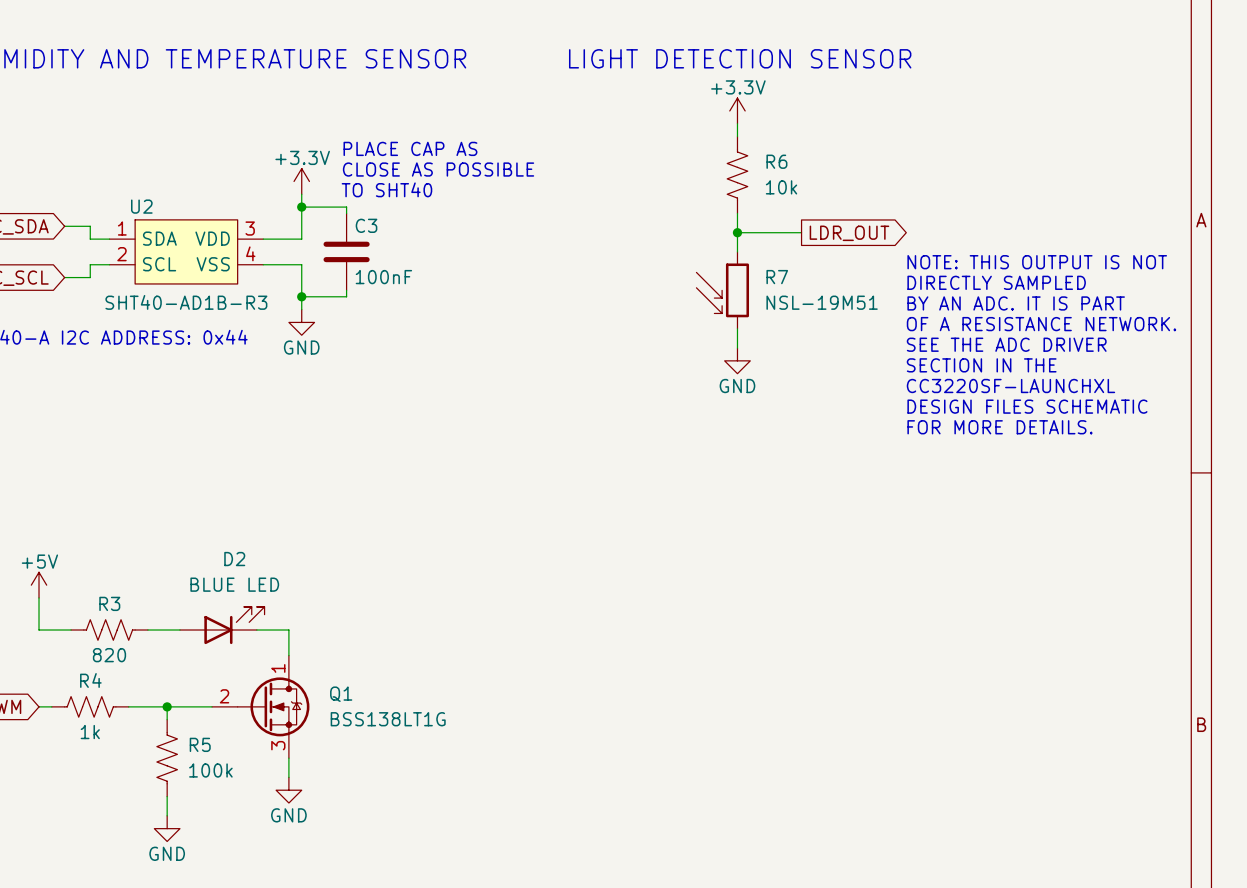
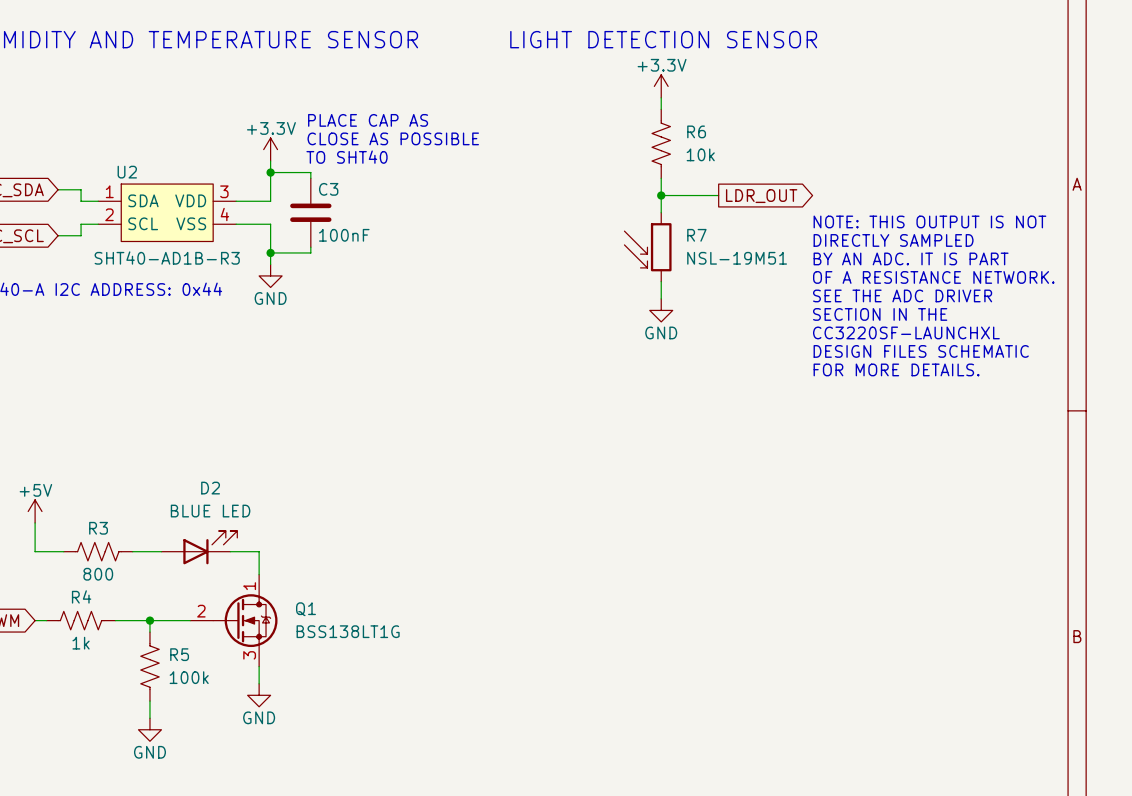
R3 value: 820 (109, 655) -> 800 (98, 574)

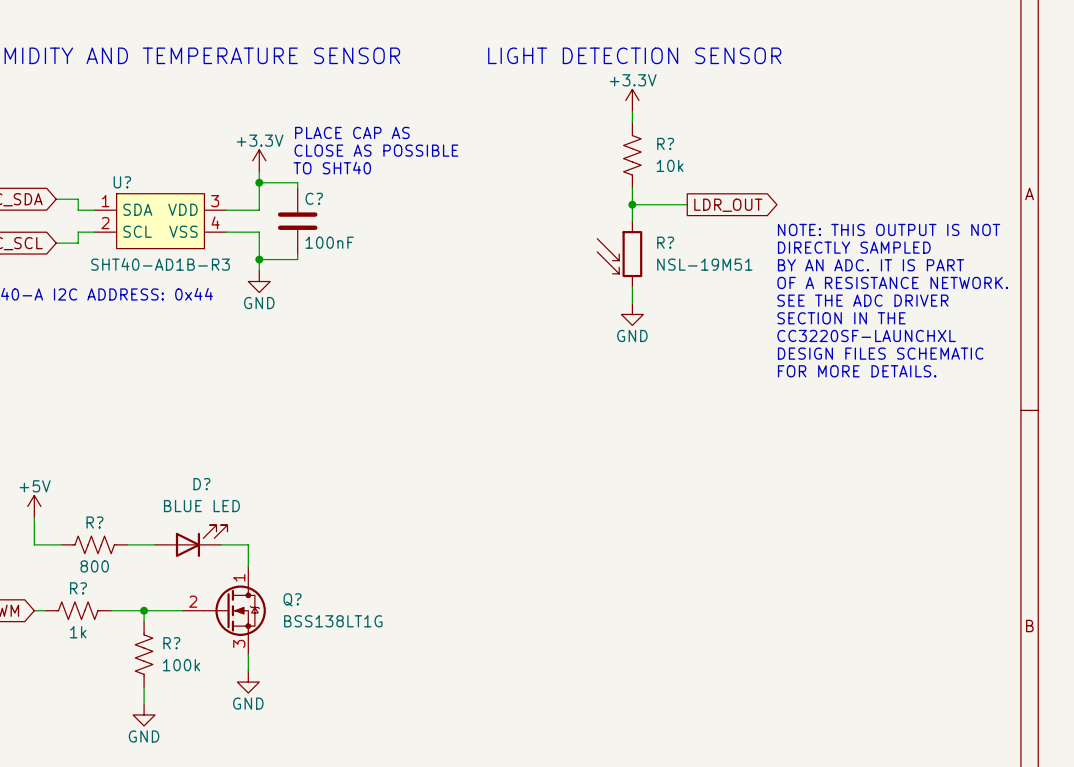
R6 name: R6 (696, 131) -> R? (665, 143)
U2 name: U2 (127, 172) -> U? (122, 182)
C3 name: C3 (328, 189) -> C? (314, 198)
R7 name: R7 (696, 235) -> R? (665, 242)
D2 name: D2 (210, 488) -> D? (201, 484)
R3 name: R3 (98, 528) -> R? (94, 522)
R4 name: R4 (81, 596) -> R? (78, 588)
Q1 name: Q1 (305, 609) -> Q? (292, 599)
R5 name: R5 (179, 654) -> R? (171, 643)

